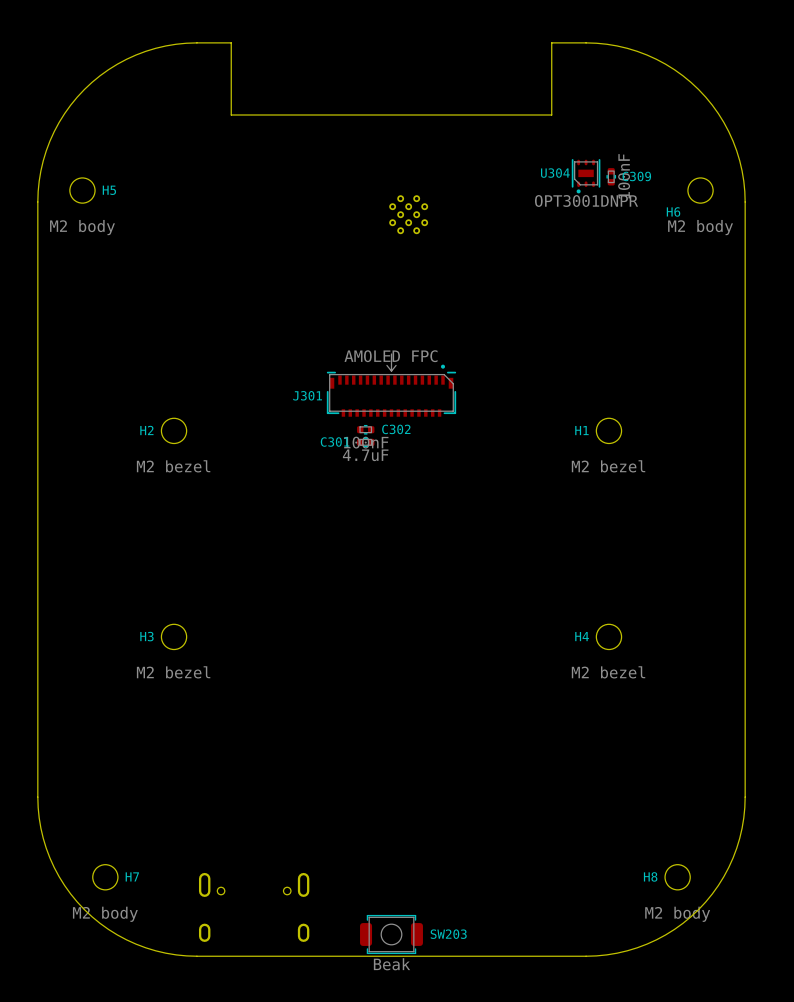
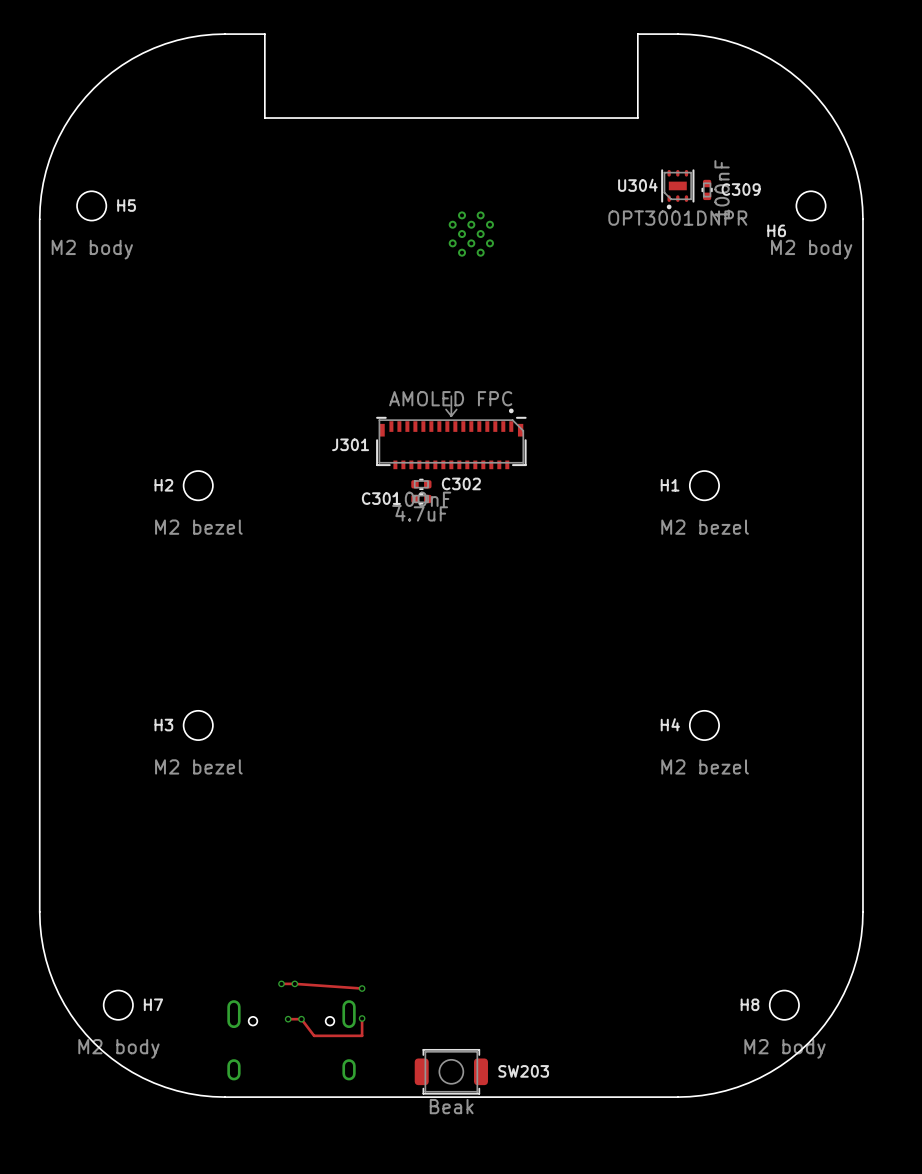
track: none -> (281, 983) (362, 988)
via: none -> (281, 983)
via: none -> (294, 983)
via: none -> (362, 988)
track: none -> (362, 1018) (362, 1035) (314, 1035) (301, 1019) (288, 1019)
via: none -> (362, 1018)
via: none -> (288, 1019)
via: none -> (301, 1019)

